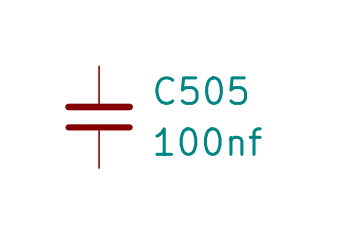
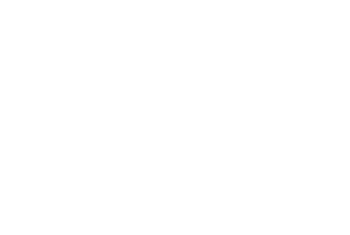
C505: (99, 117) -> none

